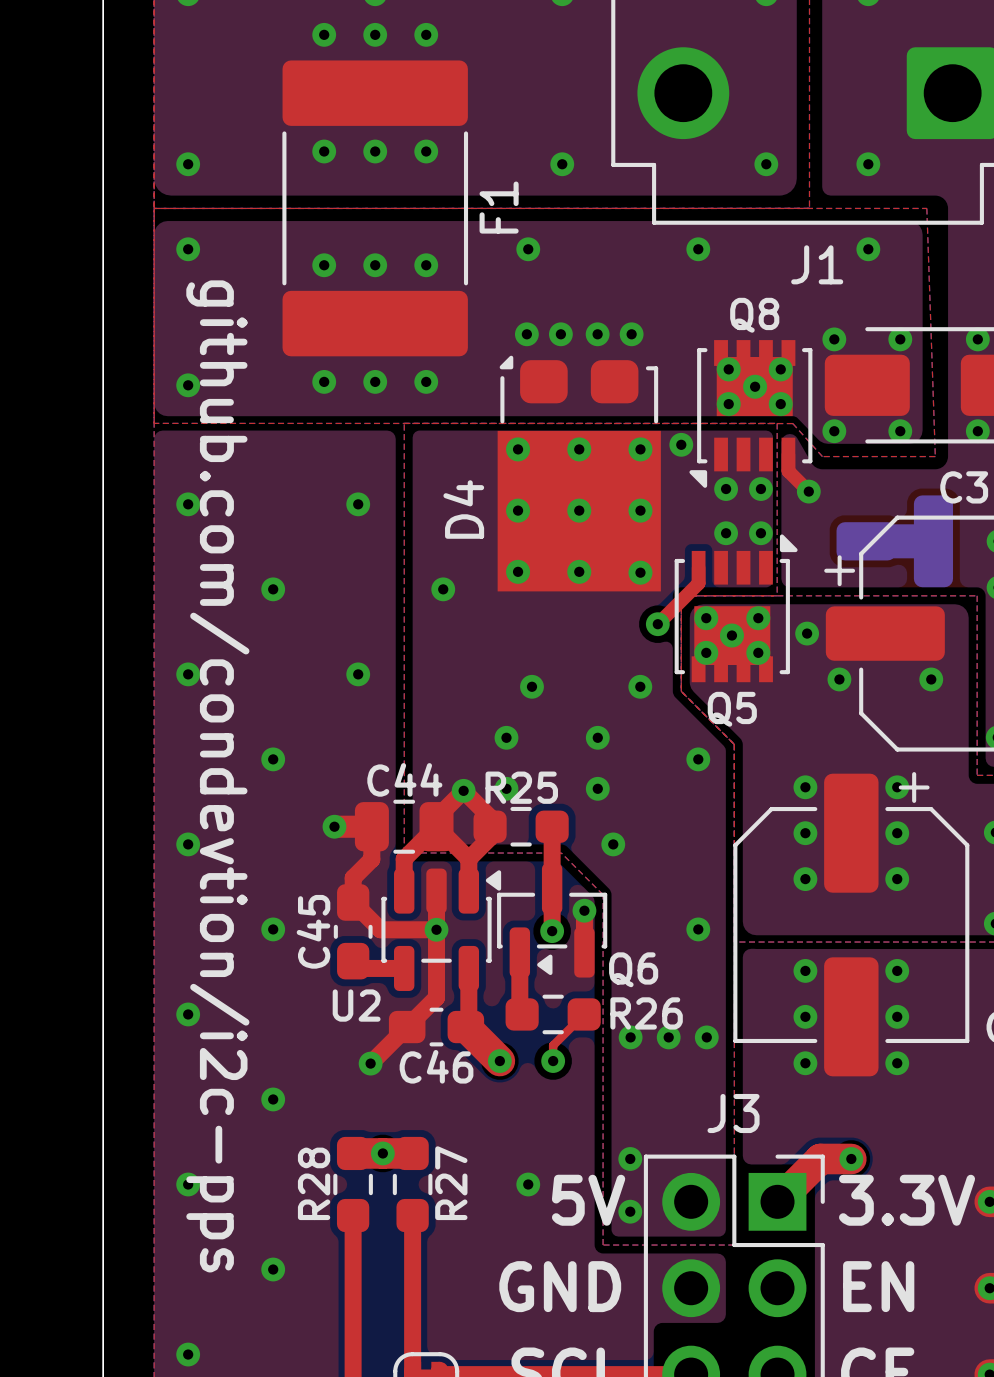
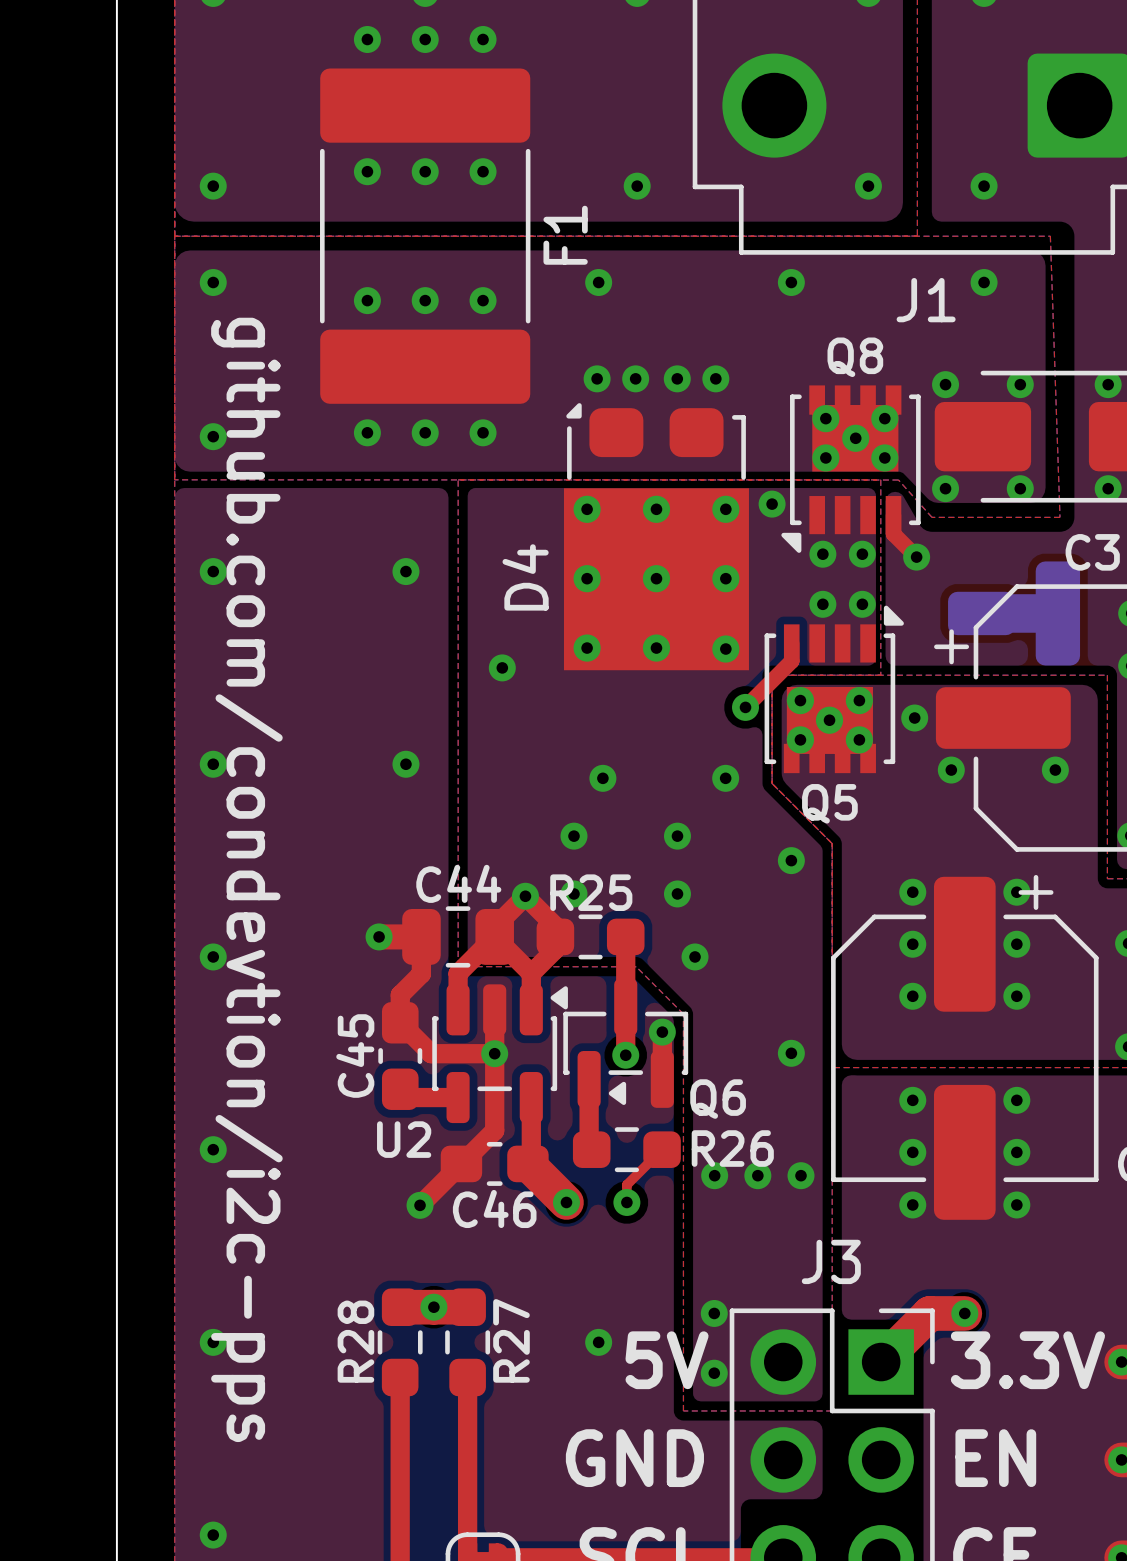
via: (273, 589) -> none
via: (273, 759) -> none
via: (273, 929) -> none
via: (273, 1099) -> none
via: (273, 1269) -> none

